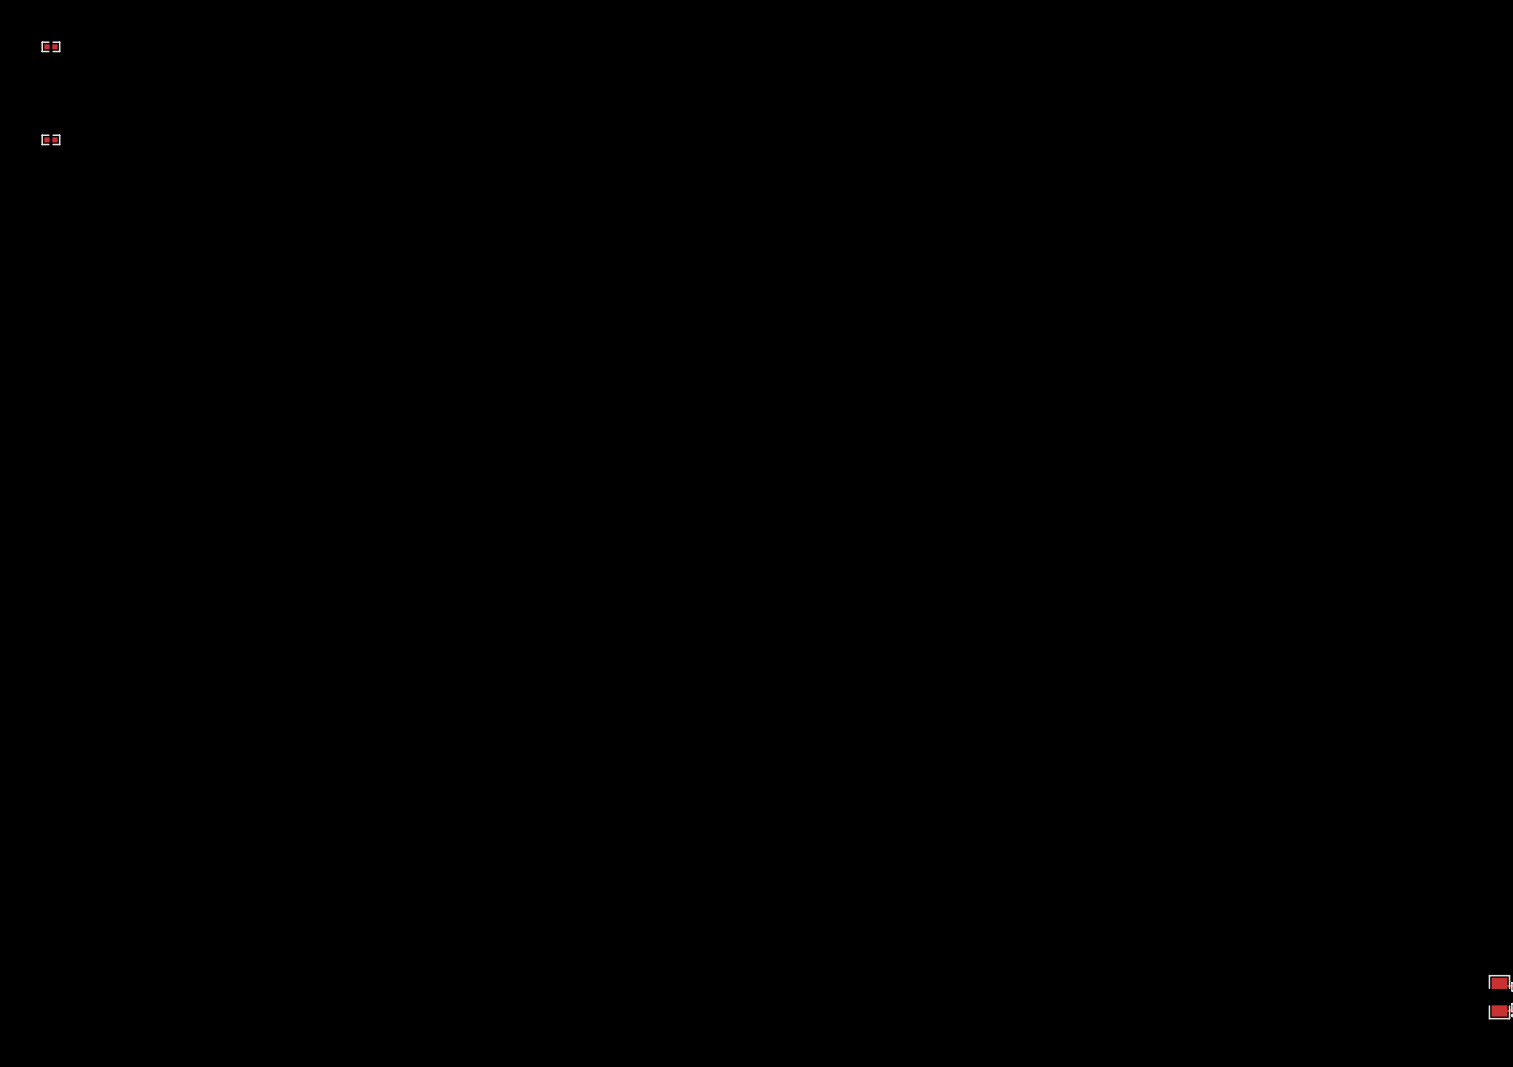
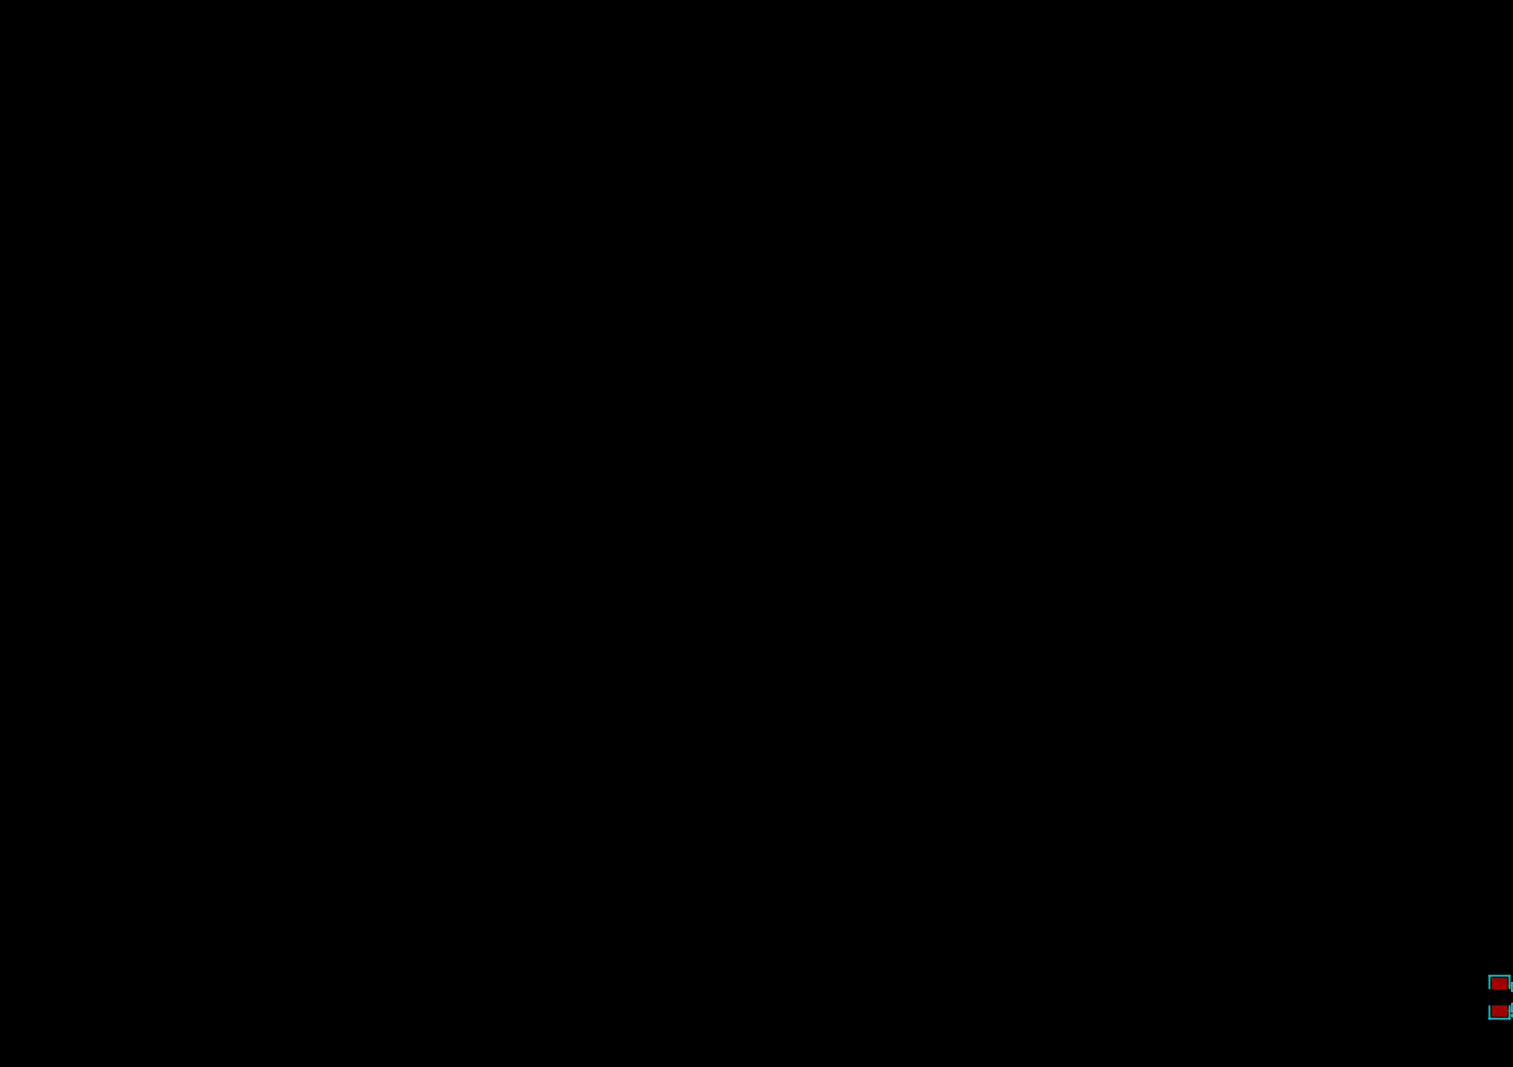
part: (50, 46) -> none
part: (50, 139) -> none

